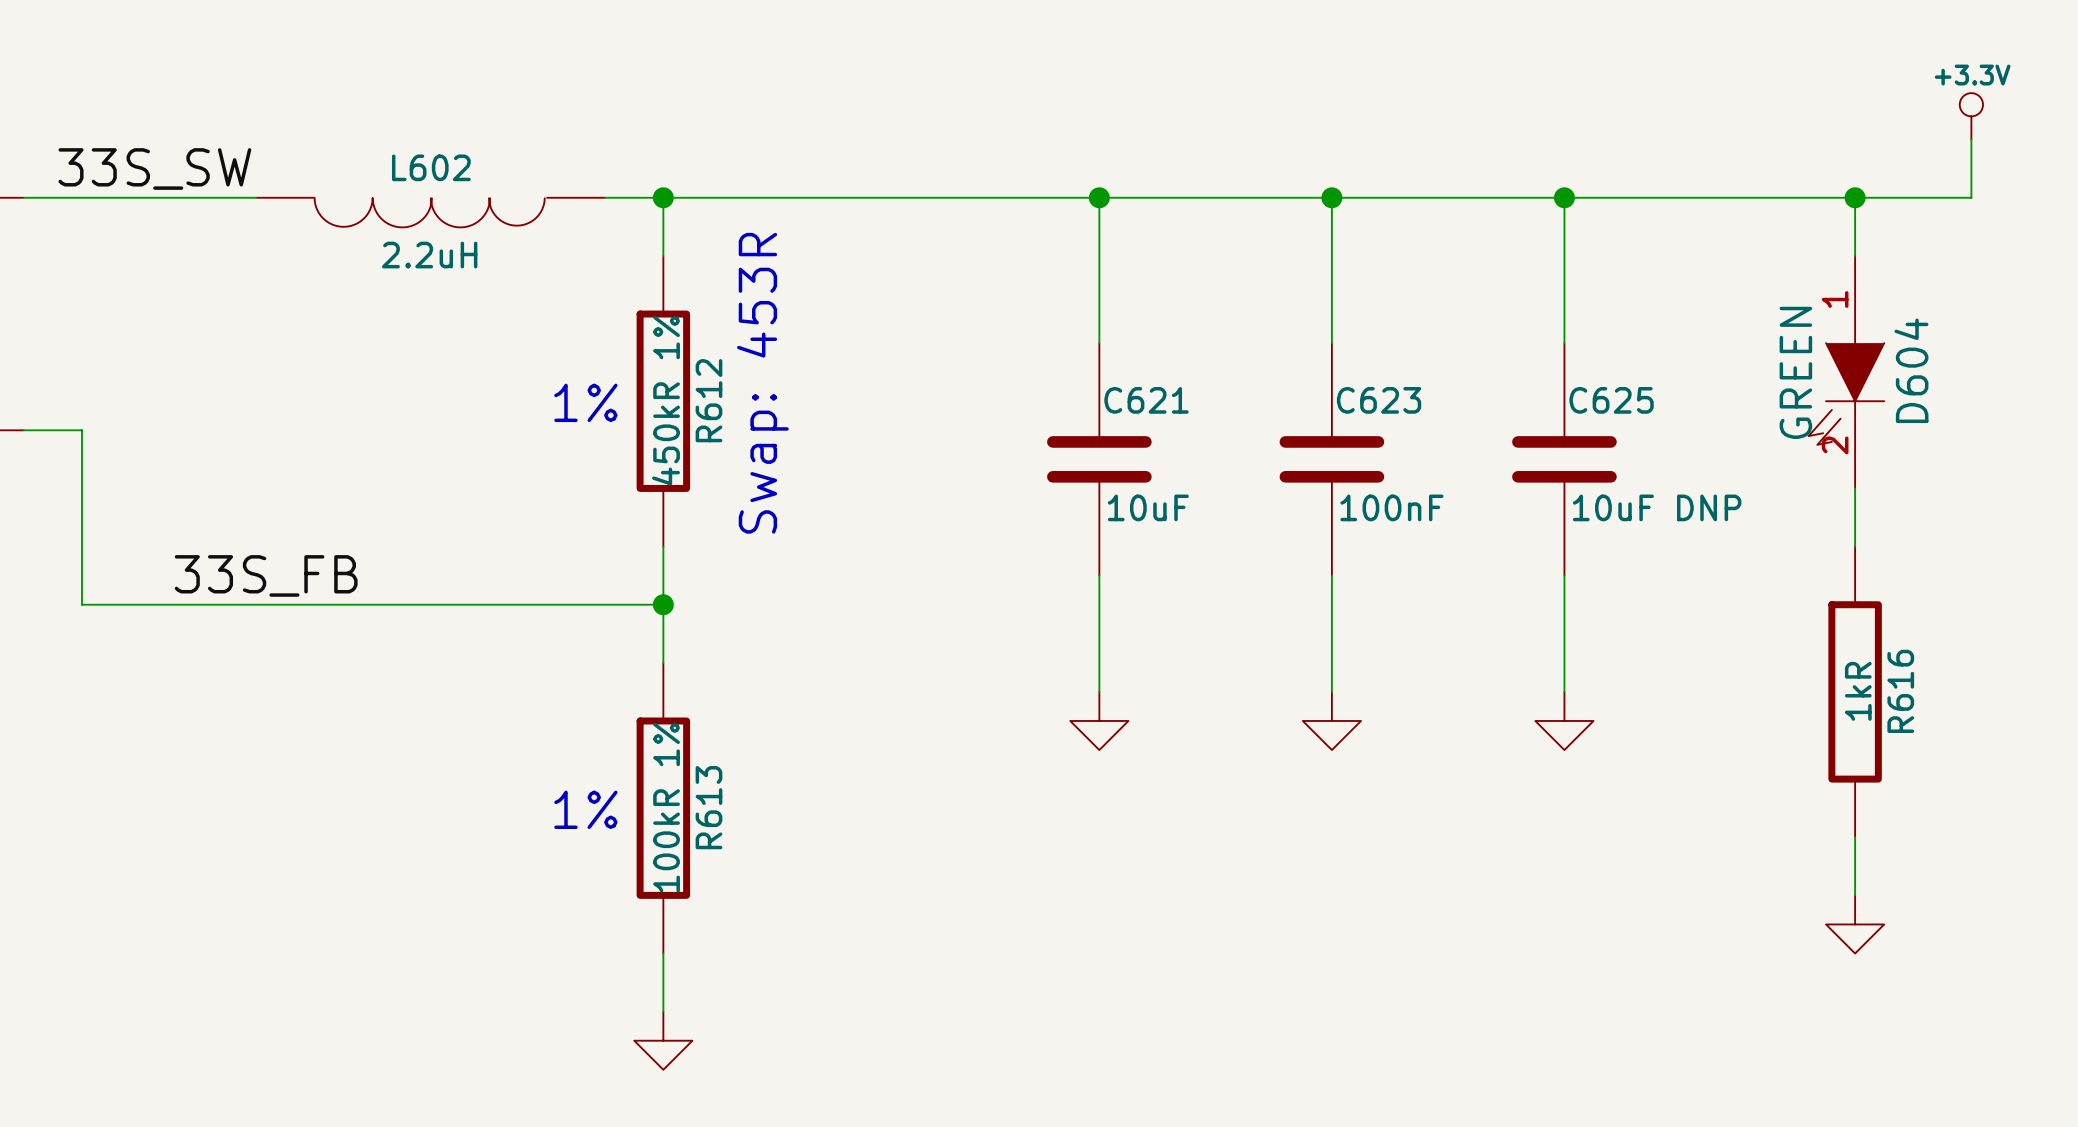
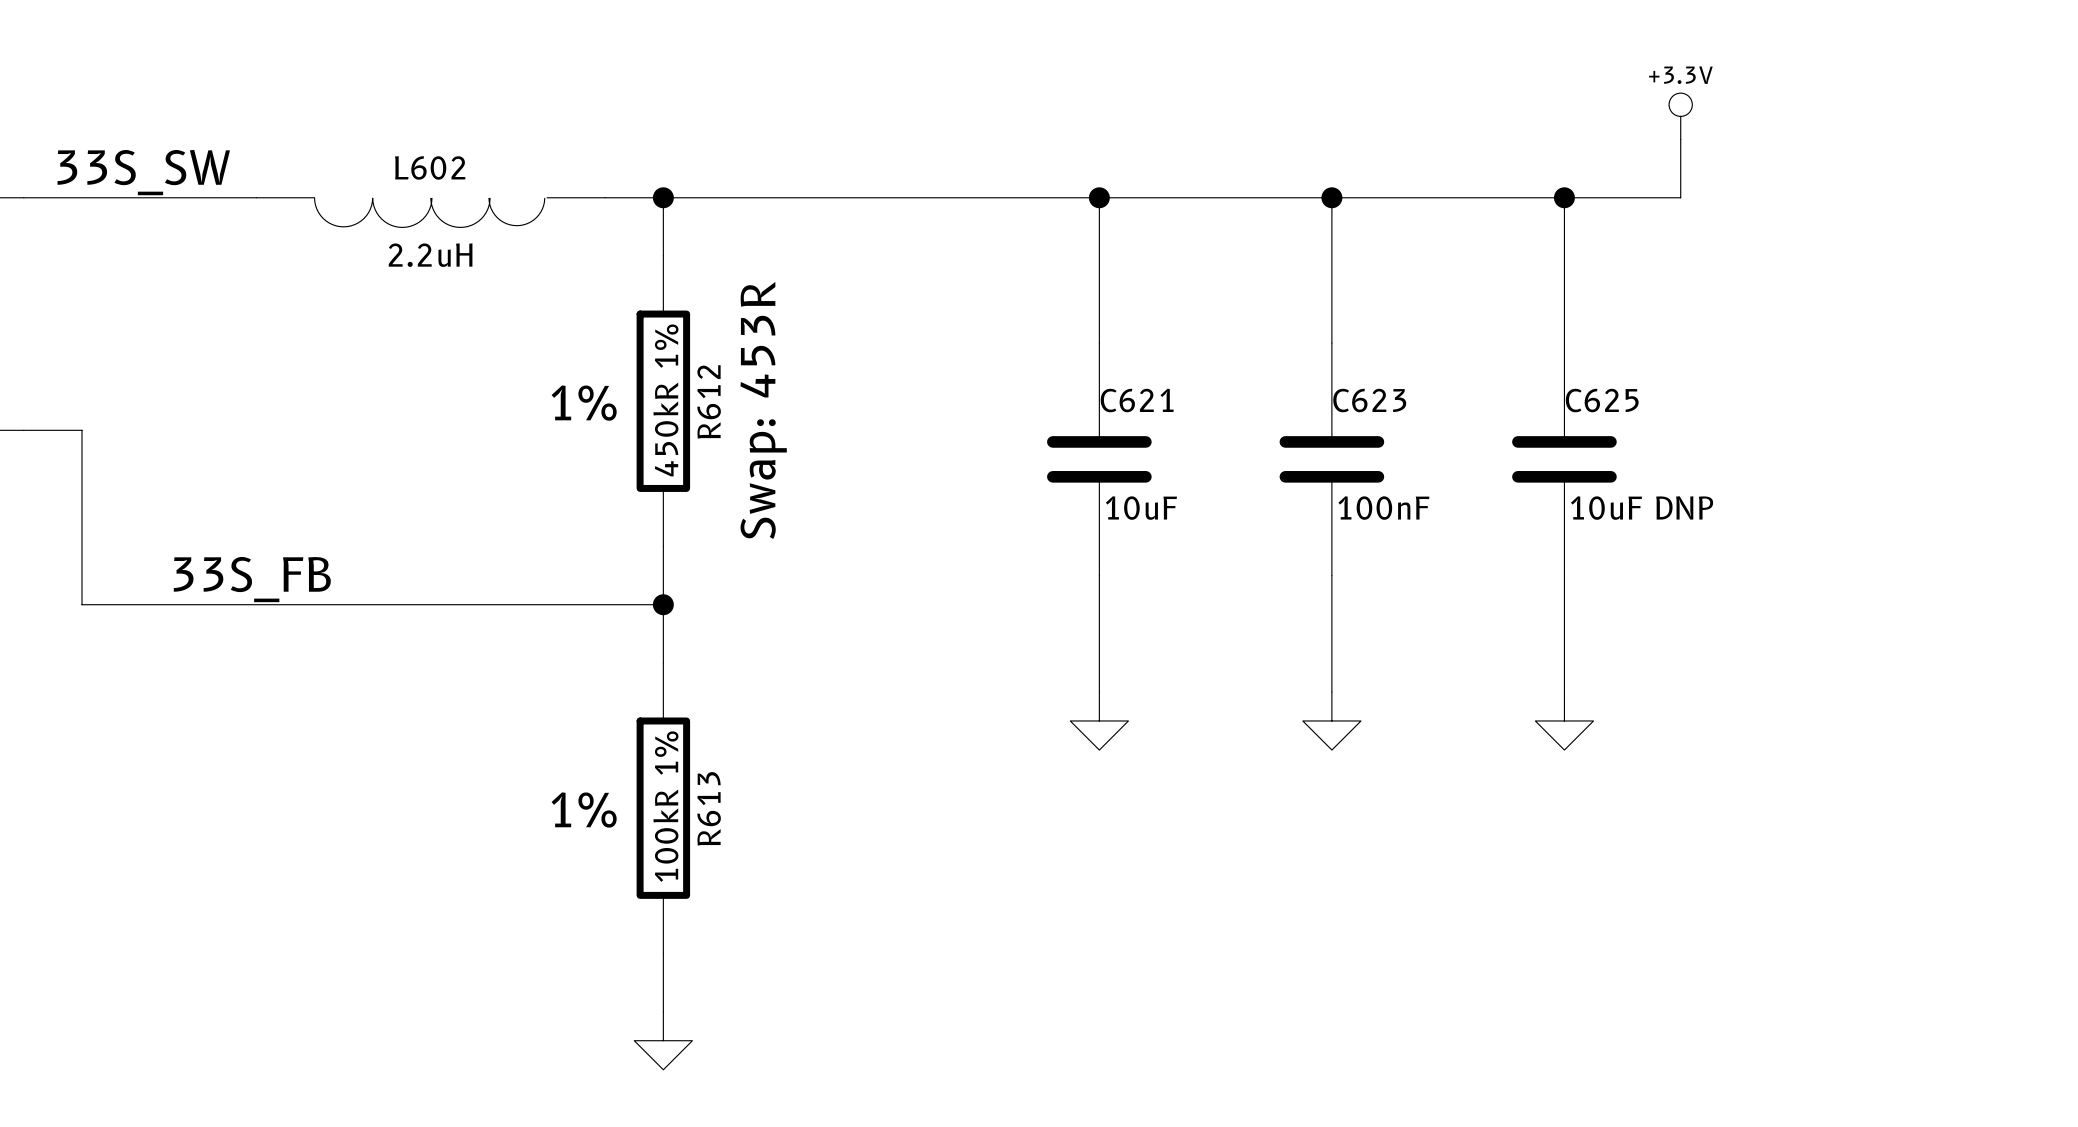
power symbol position: +3.3V (1971, 116) -> +3.3V (1680, 116)
wire: (1971, 139) (1971, 197) (1680, 197) -> (1680, 139) (1680, 197)
wire: (1855, 197) (1855, 255) -> none
junction: (1855, 197) -> none
D604: GREEN (1846, 372) -> none
wire: (1855, 488) (1855, 546) -> none
R616: 1kR (1855, 691) -> none
wire: (1855, 837) (1855, 895) -> none
power symbol: (1855, 924) -> none

